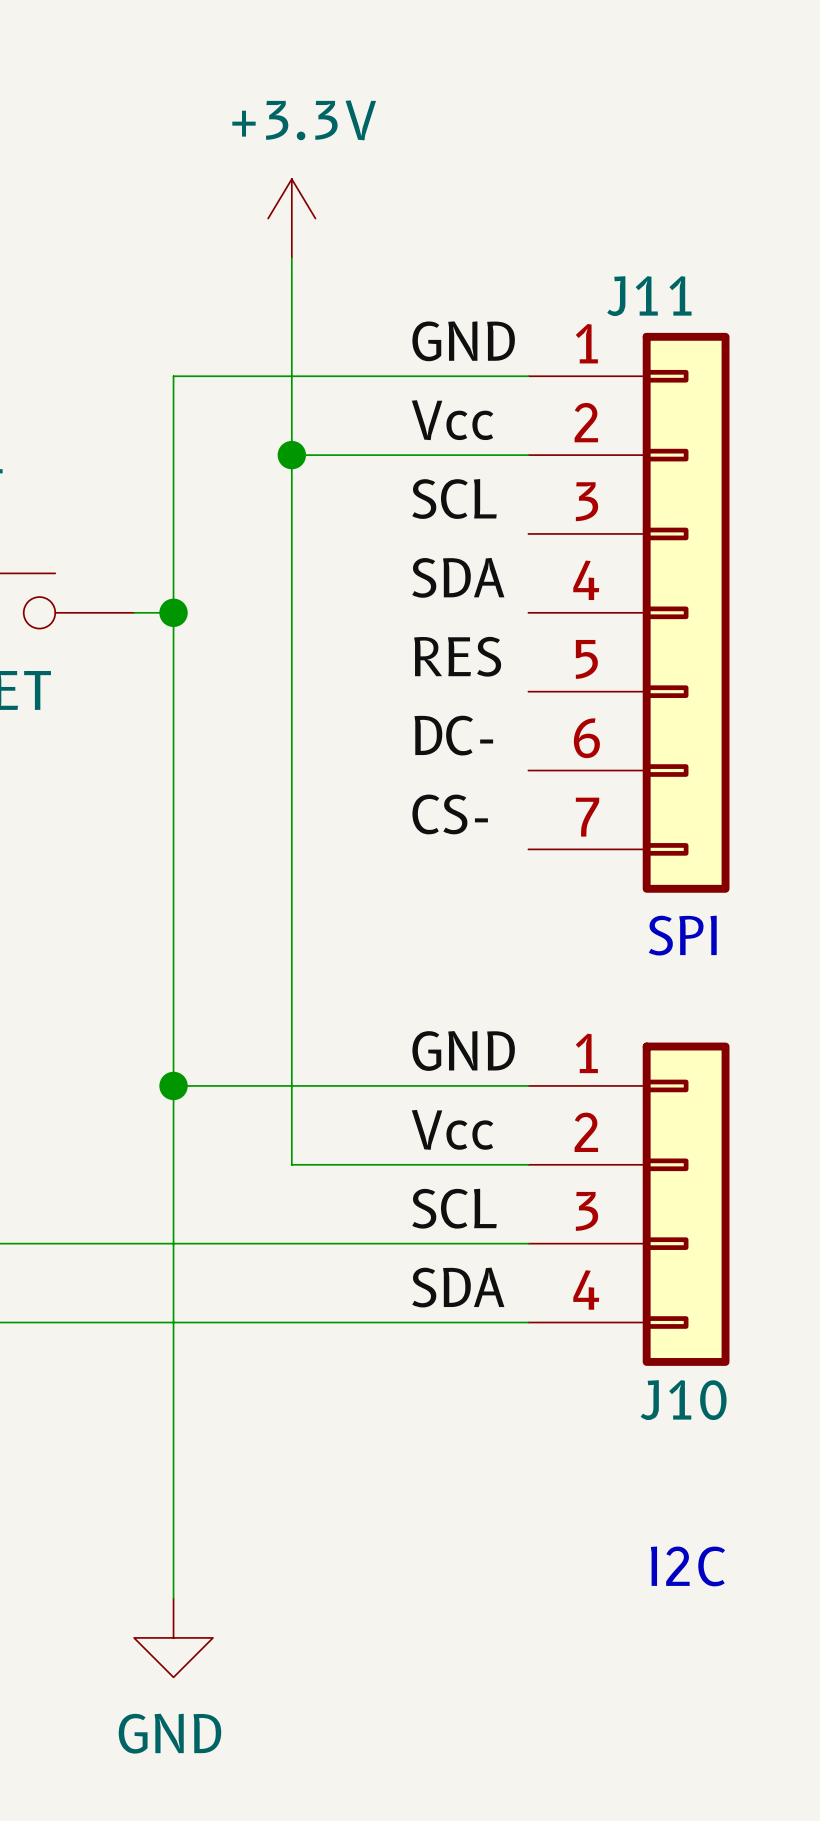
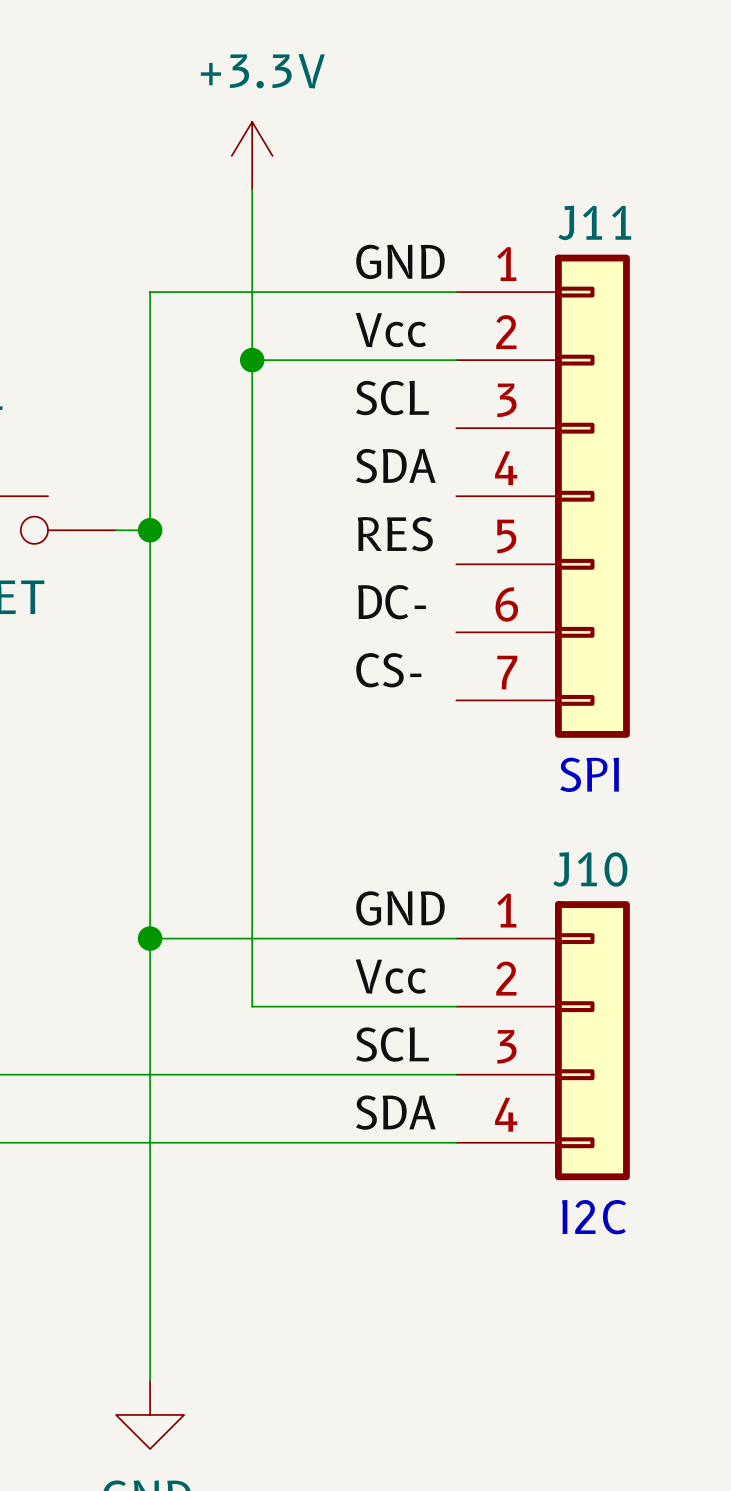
power symbol position: +3.3V (291, 218) -> +3.3V (252, 155)
J11 name position: J11 (649, 296) -> J11 (594, 222)
label position: GND (463, 341) -> GND (400, 261)
wire: (173, 376) (528, 376) -> (150, 326) (150, 292) (456, 292)
label position: Vcc (452, 420) -> Vcc (390, 329)
wire: (291, 455) (528, 455) -> (252, 360) (456, 360)
junction position: (291, 455) -> (252, 360)
label position: SCL (454, 498) -> SCL (392, 398)
label position: SDA (458, 577) -> SDA (395, 466)
J11 position: (628, 612) -> (543, 496)
label position: RES (457, 656) -> RES (395, 534)
label position: DC- (453, 735) -> DC- (391, 602)
label position: CS- (450, 814) -> CS- (388, 670)
text position: SPI (682, 935) -> SPI (589, 774)
J10 name position: J10 (683, 1400) -> J10 (590, 869)
text position: I2C (687, 1566) -> I2C (594, 1217)

